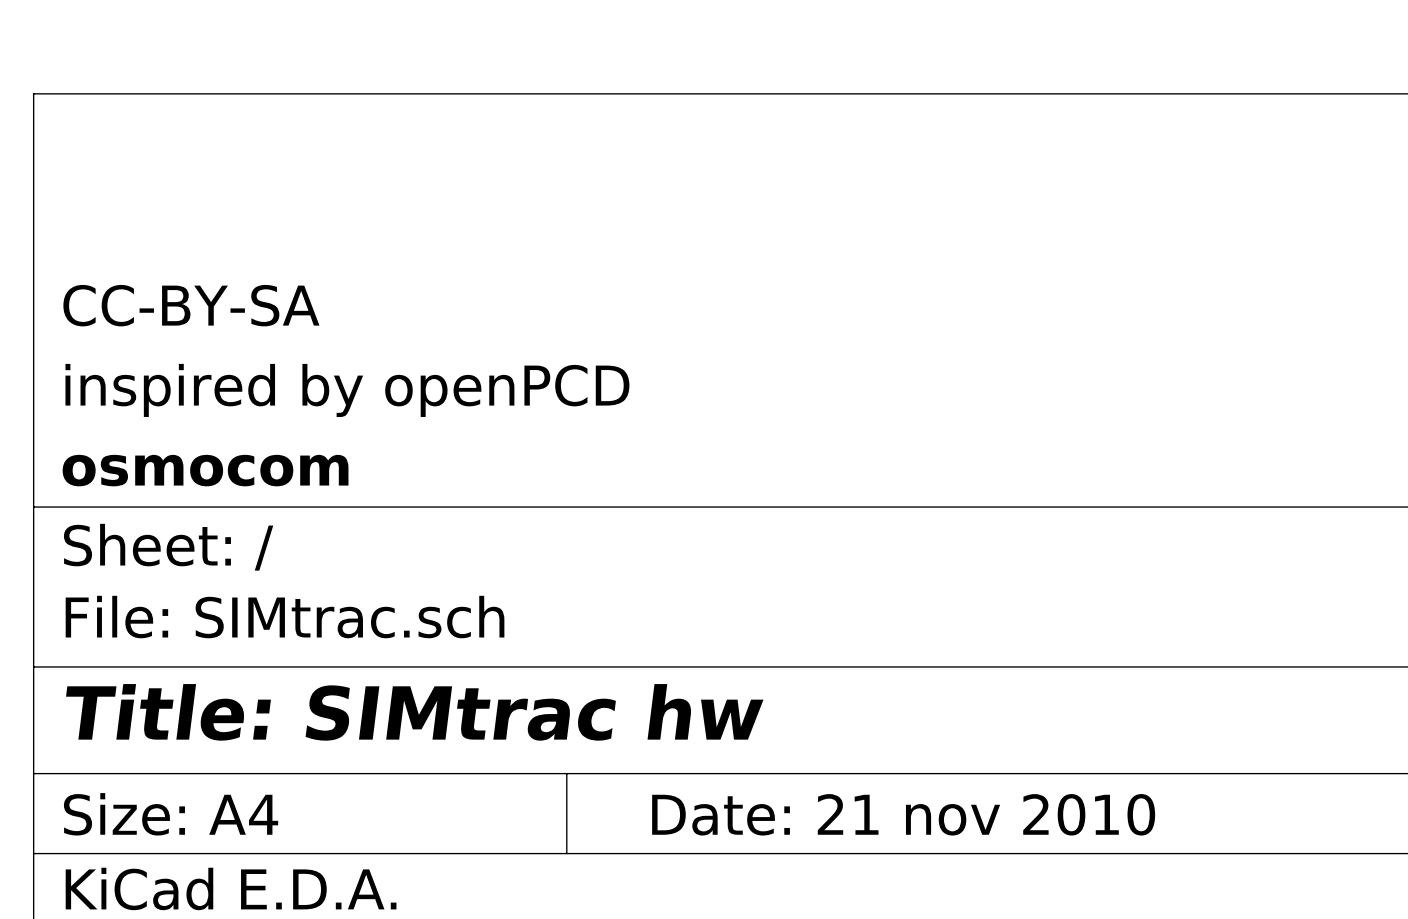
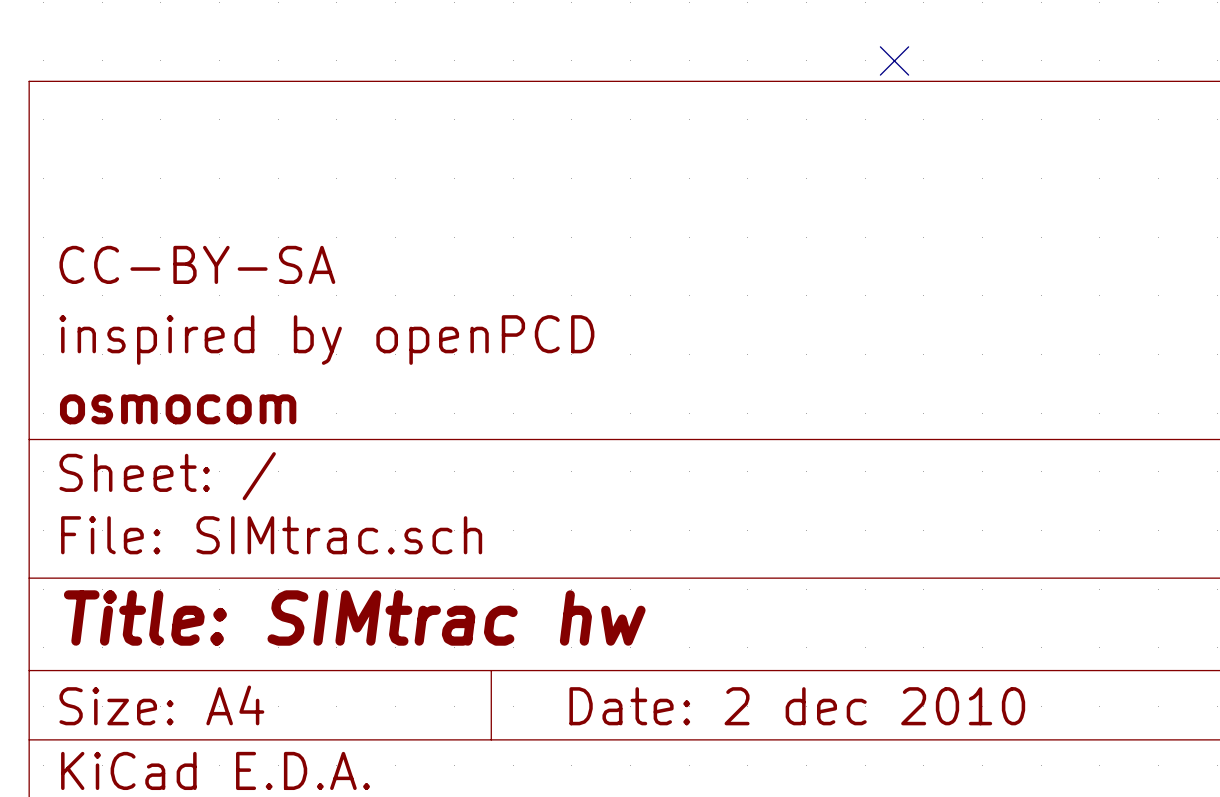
no-connect mark: none -> (894, 60)
title block: Date: 21 nov 2010 (903, 814) -> Date: 2 dec 2010 (797, 706)

